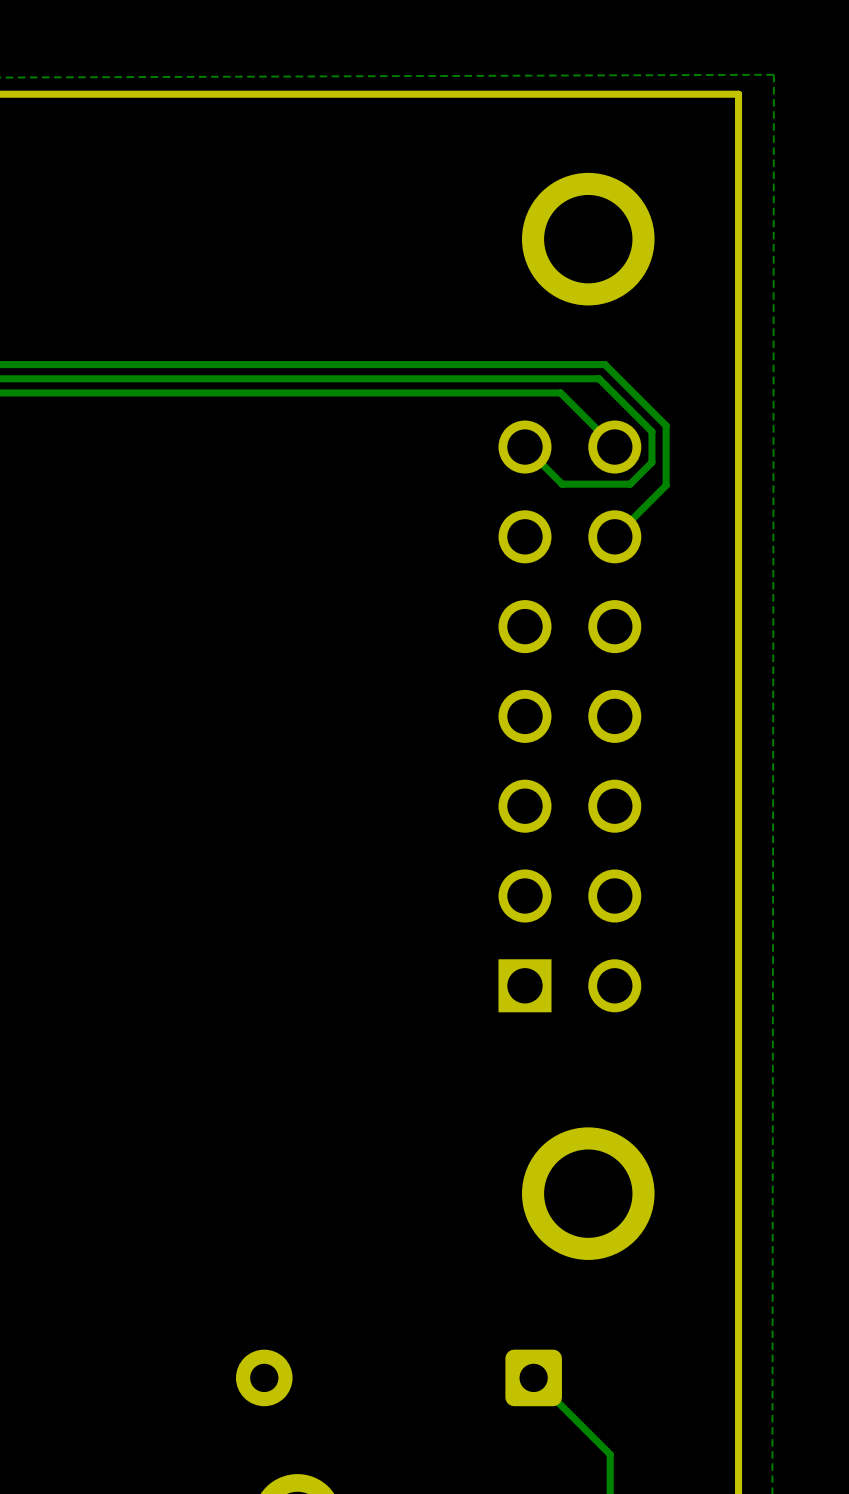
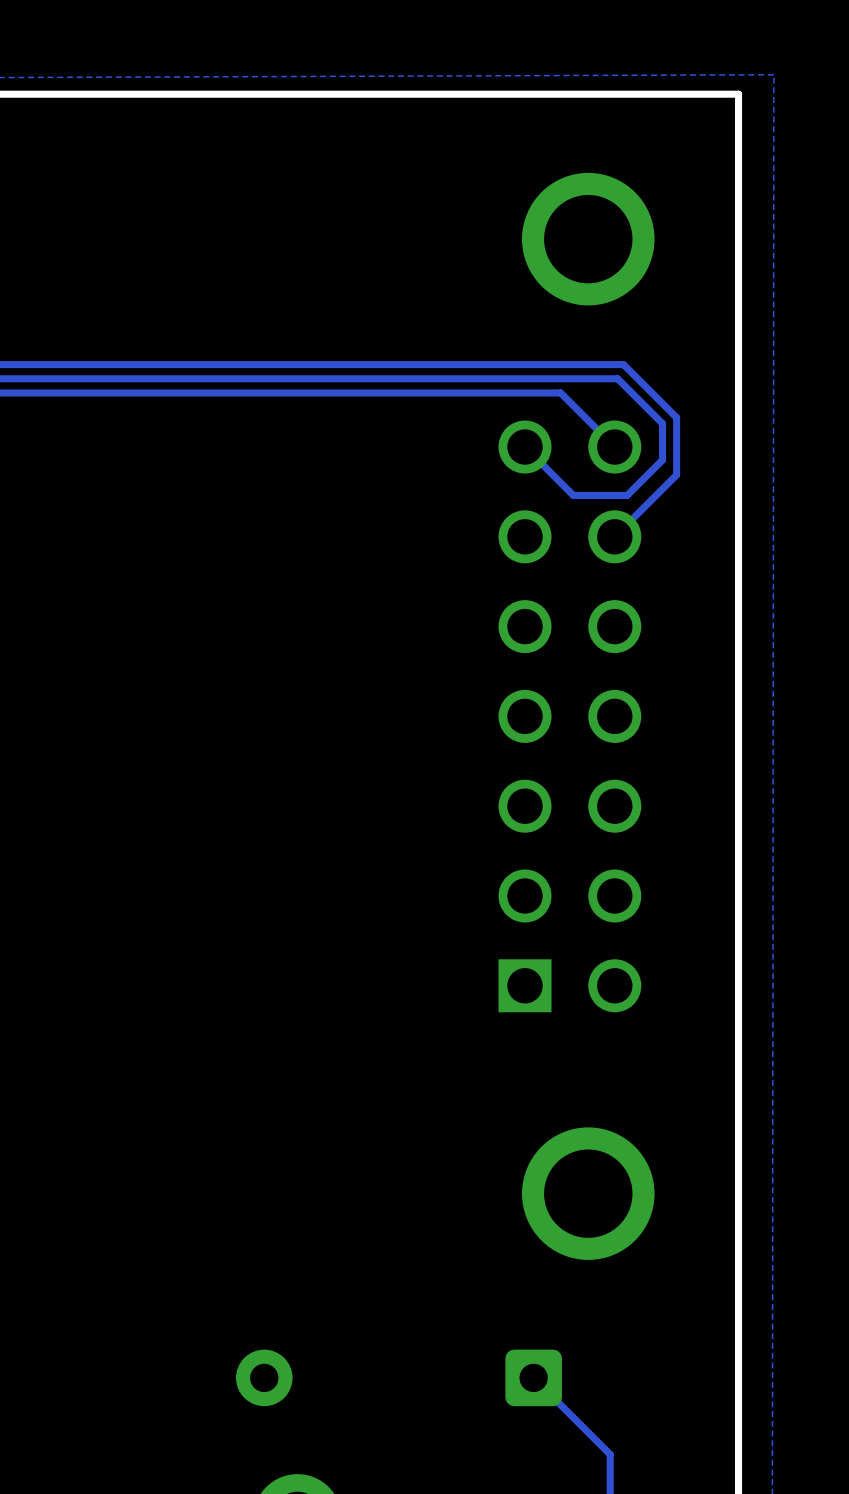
track: (604, 364) (666, 425) (666, 485) -> (604, 364) (623, 364) (676, 417) (676, 474) (666, 485)
track: (599, 378) (651, 431) (651, 462) (630, 484) (562, 484) -> (599, 378) (617, 378) (662, 423) (662, 460) (627, 495) (573, 495) (562, 484)

